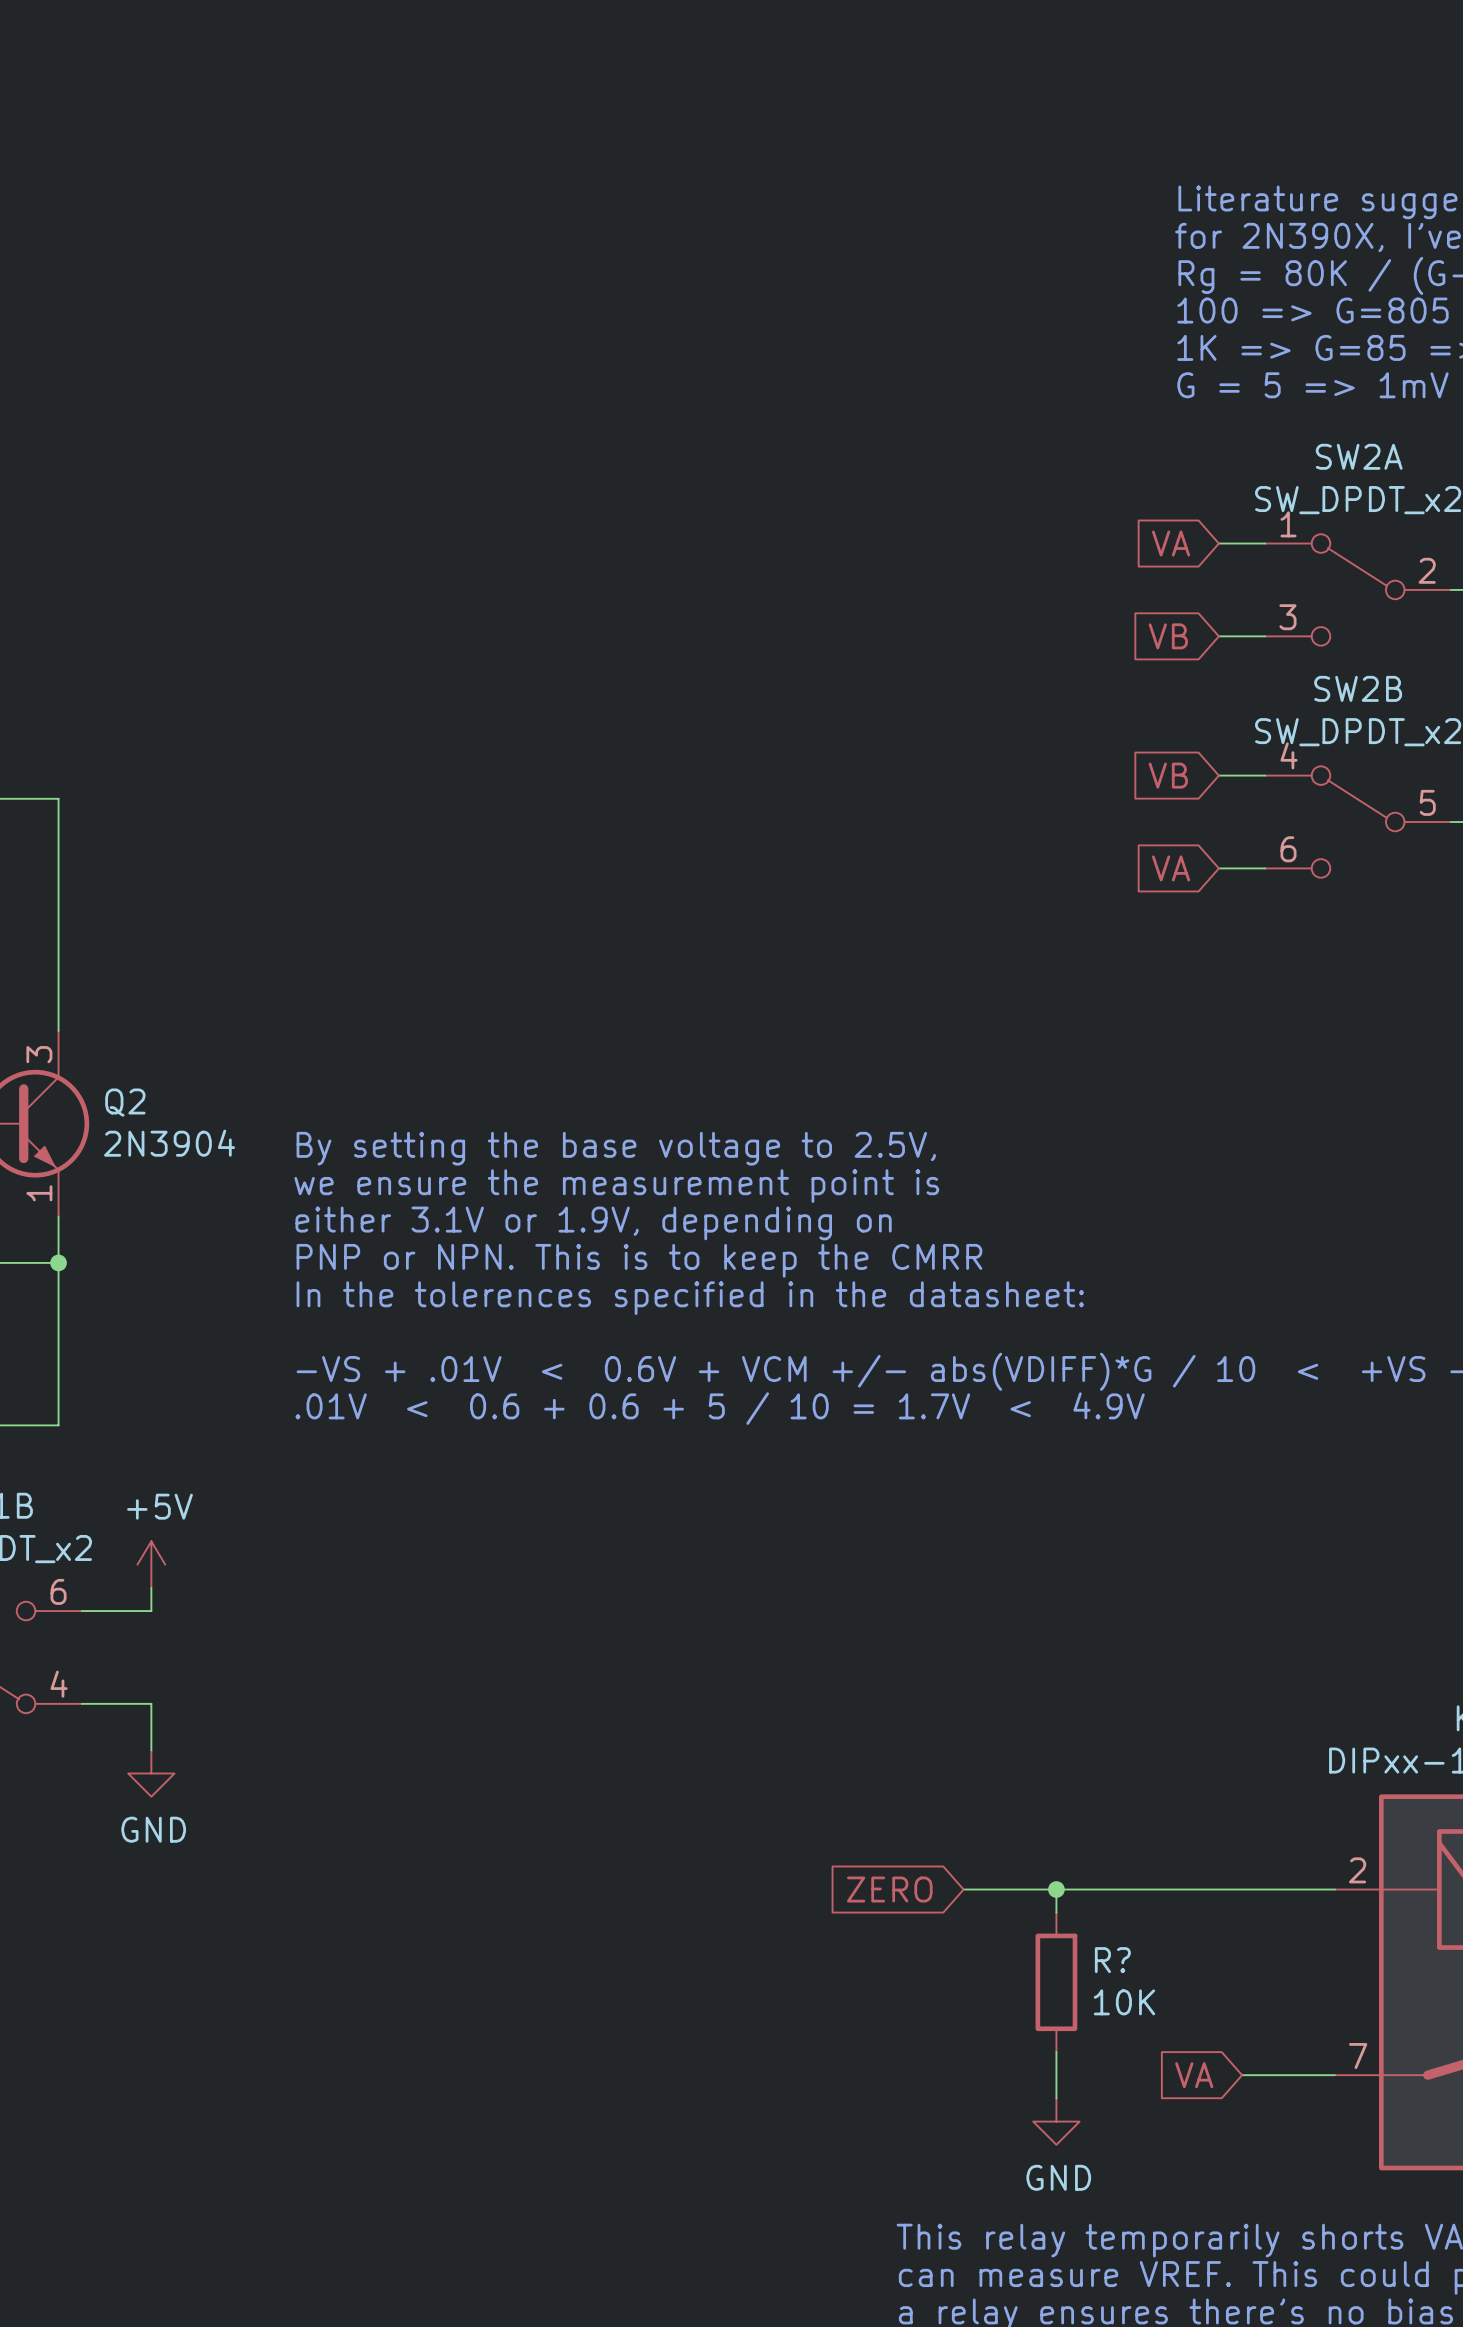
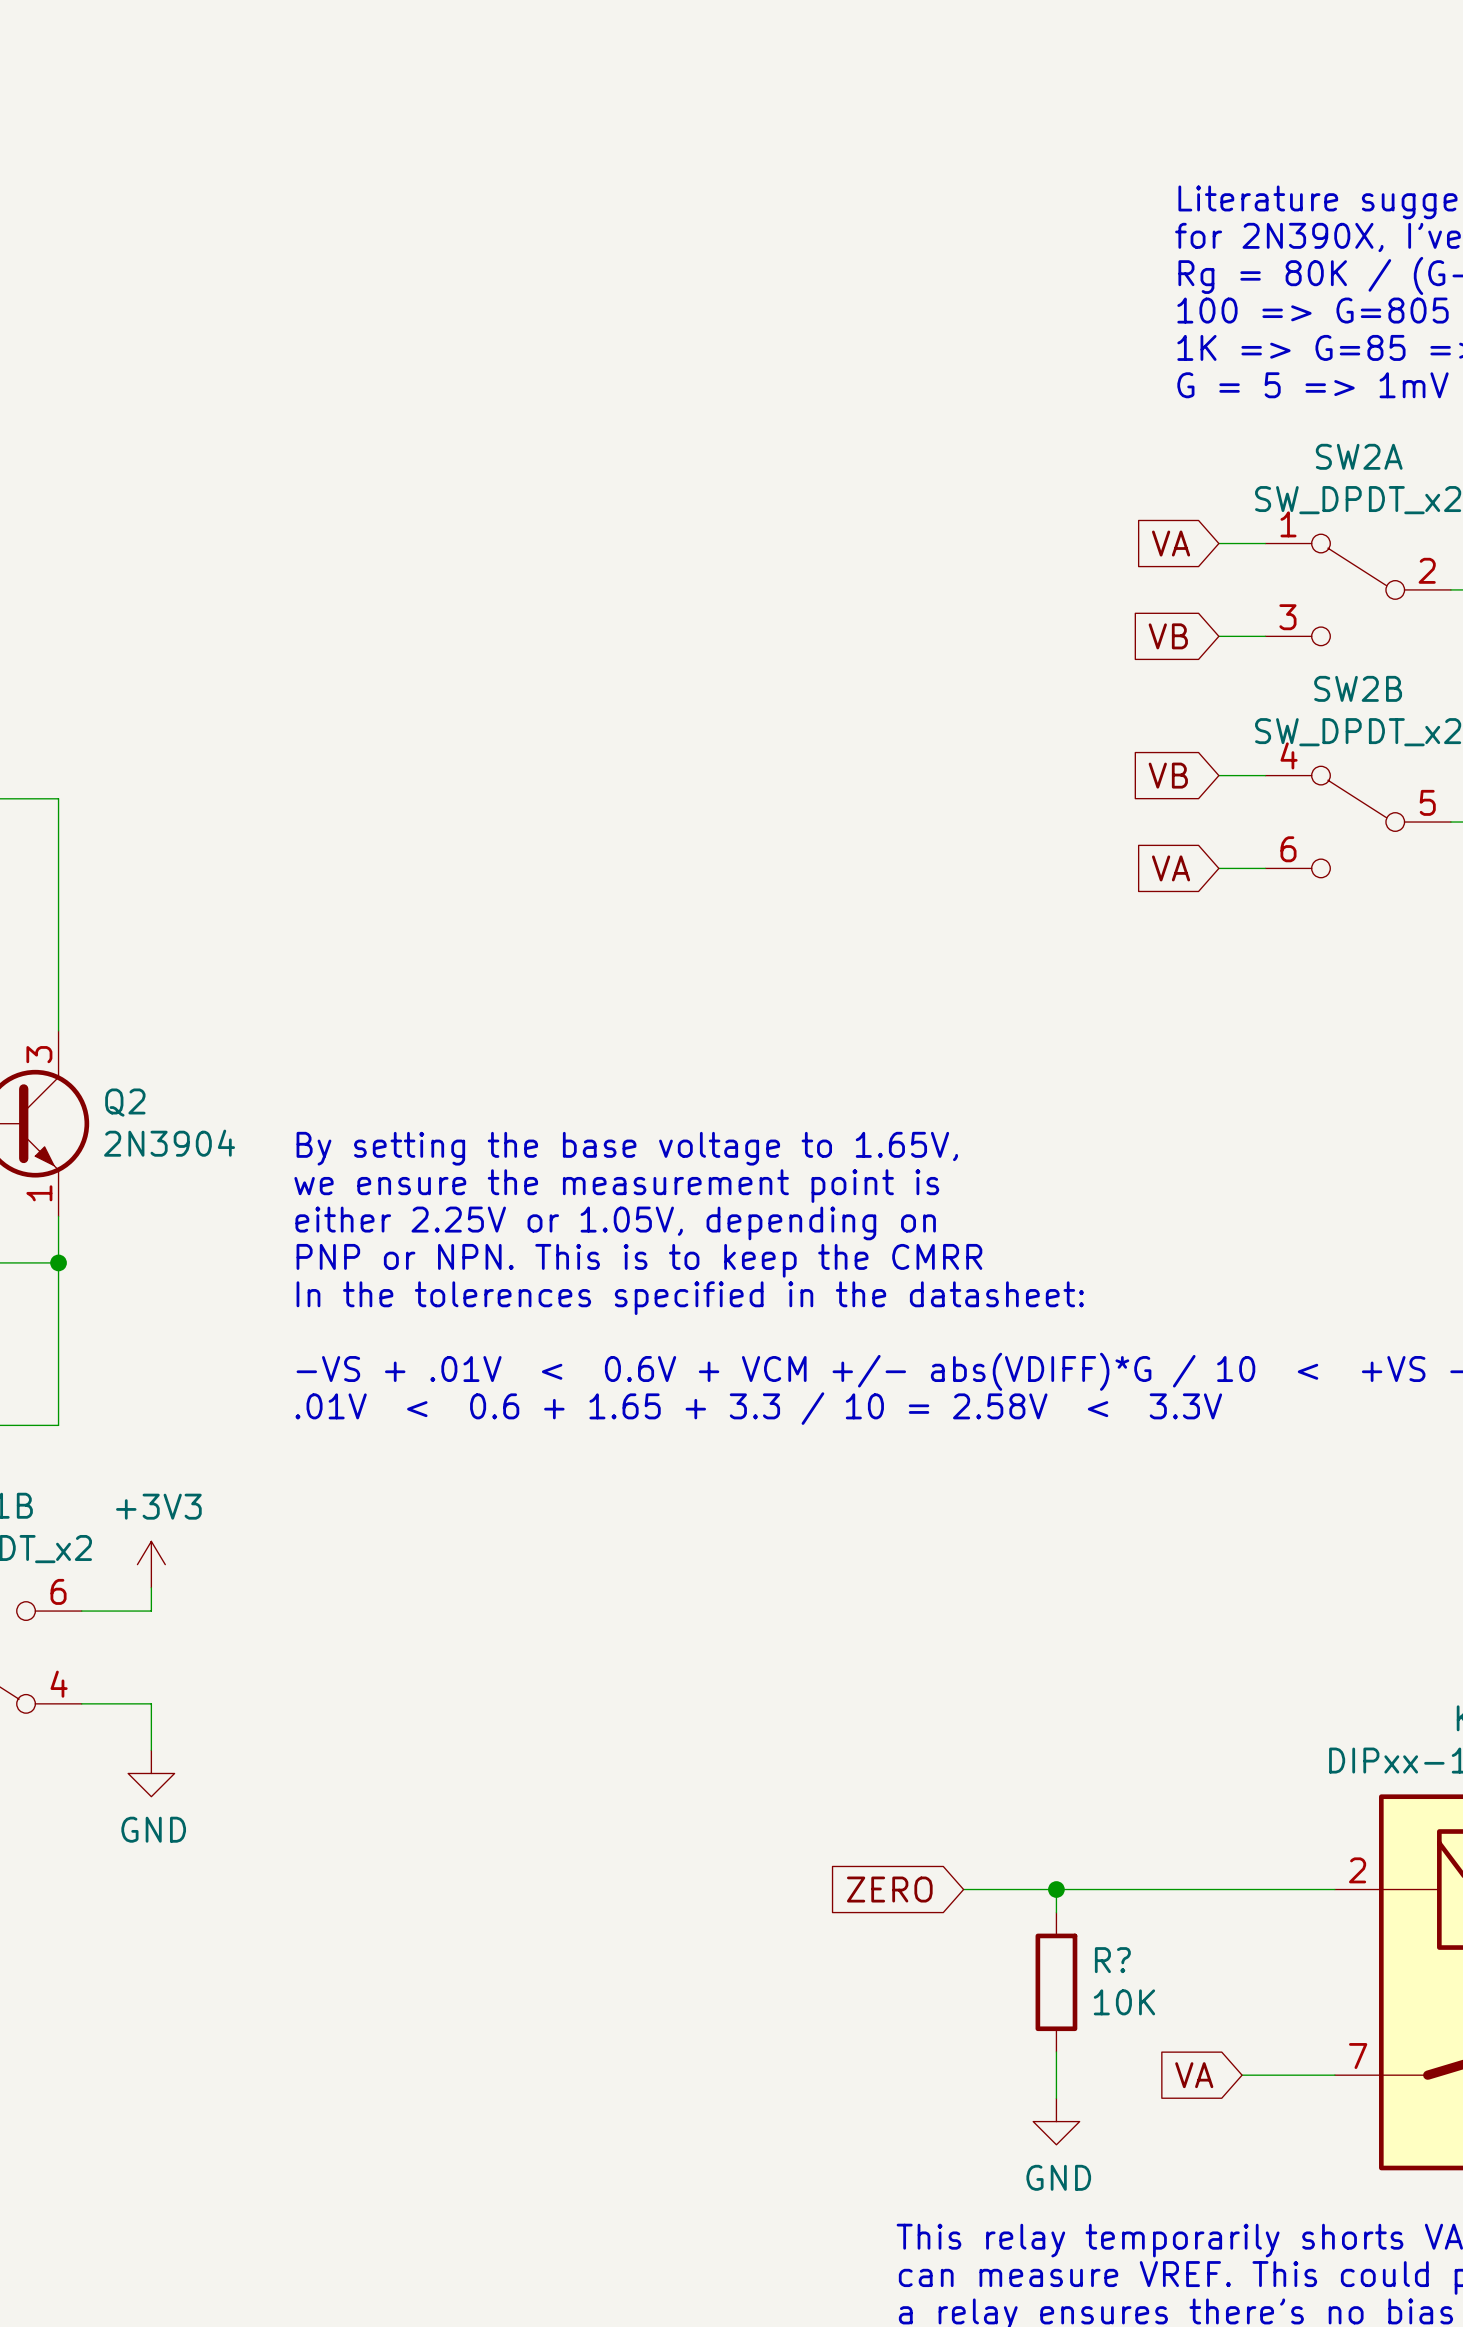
text: By setting the base voltage to 2.5V, (616, 1148) -> By setting the base voltage to 1.65V, (627, 1148)
text: either 3.1V or 1.9V, depending on (593, 1223) -> either 2.25V or 1.05V, depending on (615, 1223)
text: .01V < 0.6 + 0.6 + 5 / 10 = 1.7V < 4.9V (720, 1408) -> .01V < 0.6 + 1.65 + 3.3 / 10 = 2.58V < 3.3V (758, 1408)
power symbol: +5V (151, 1564) -> +3V3 (151, 1564)

